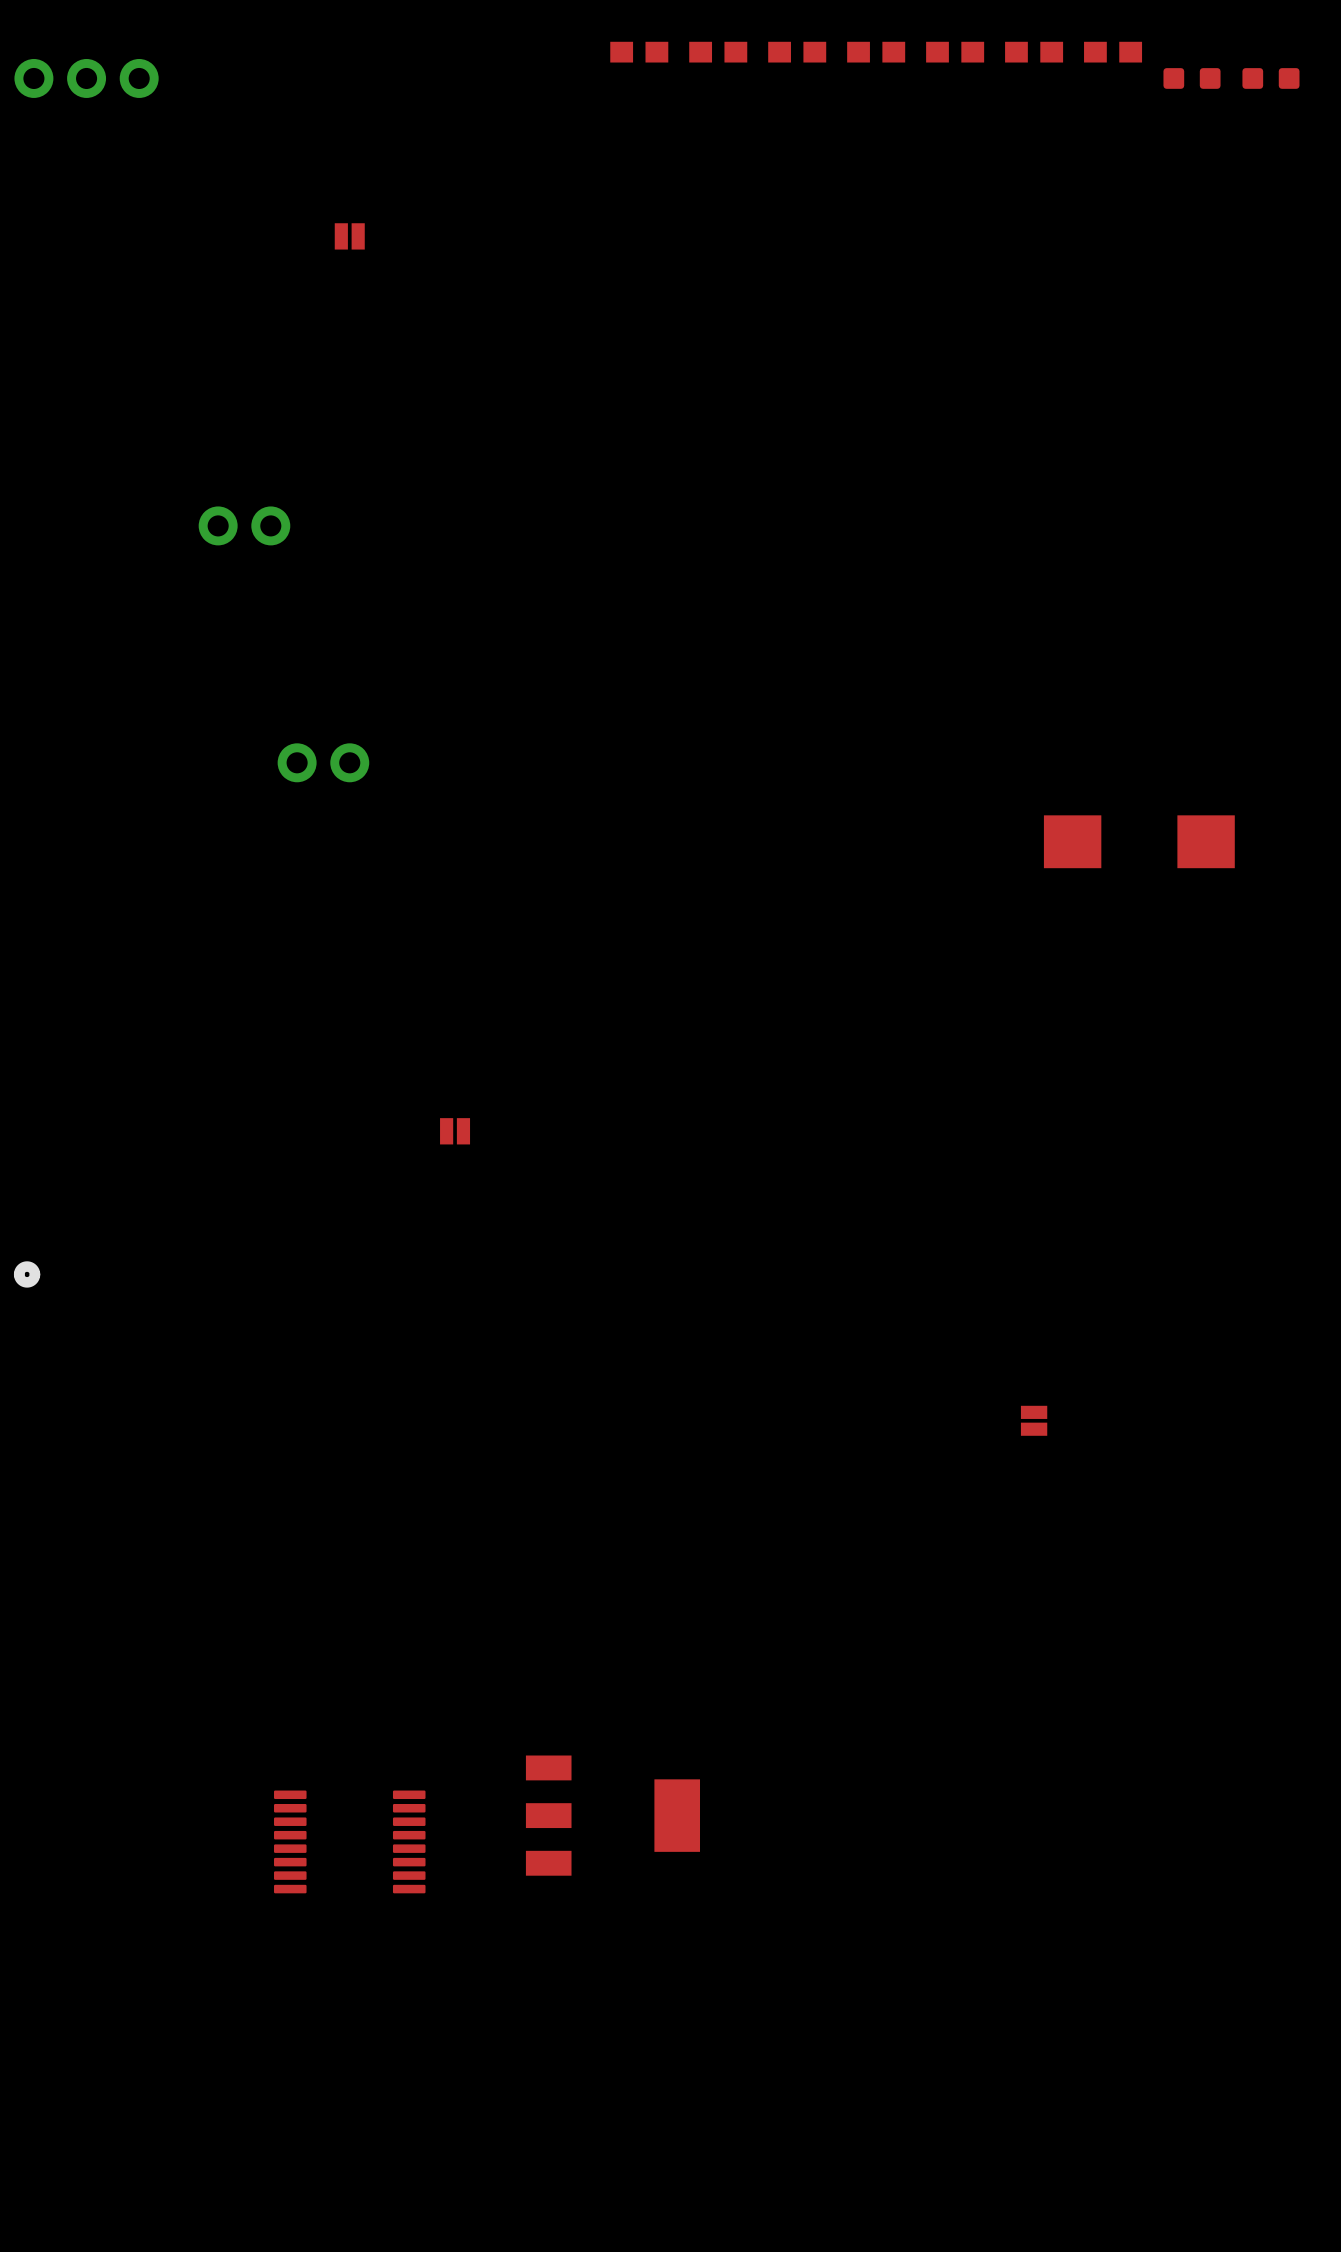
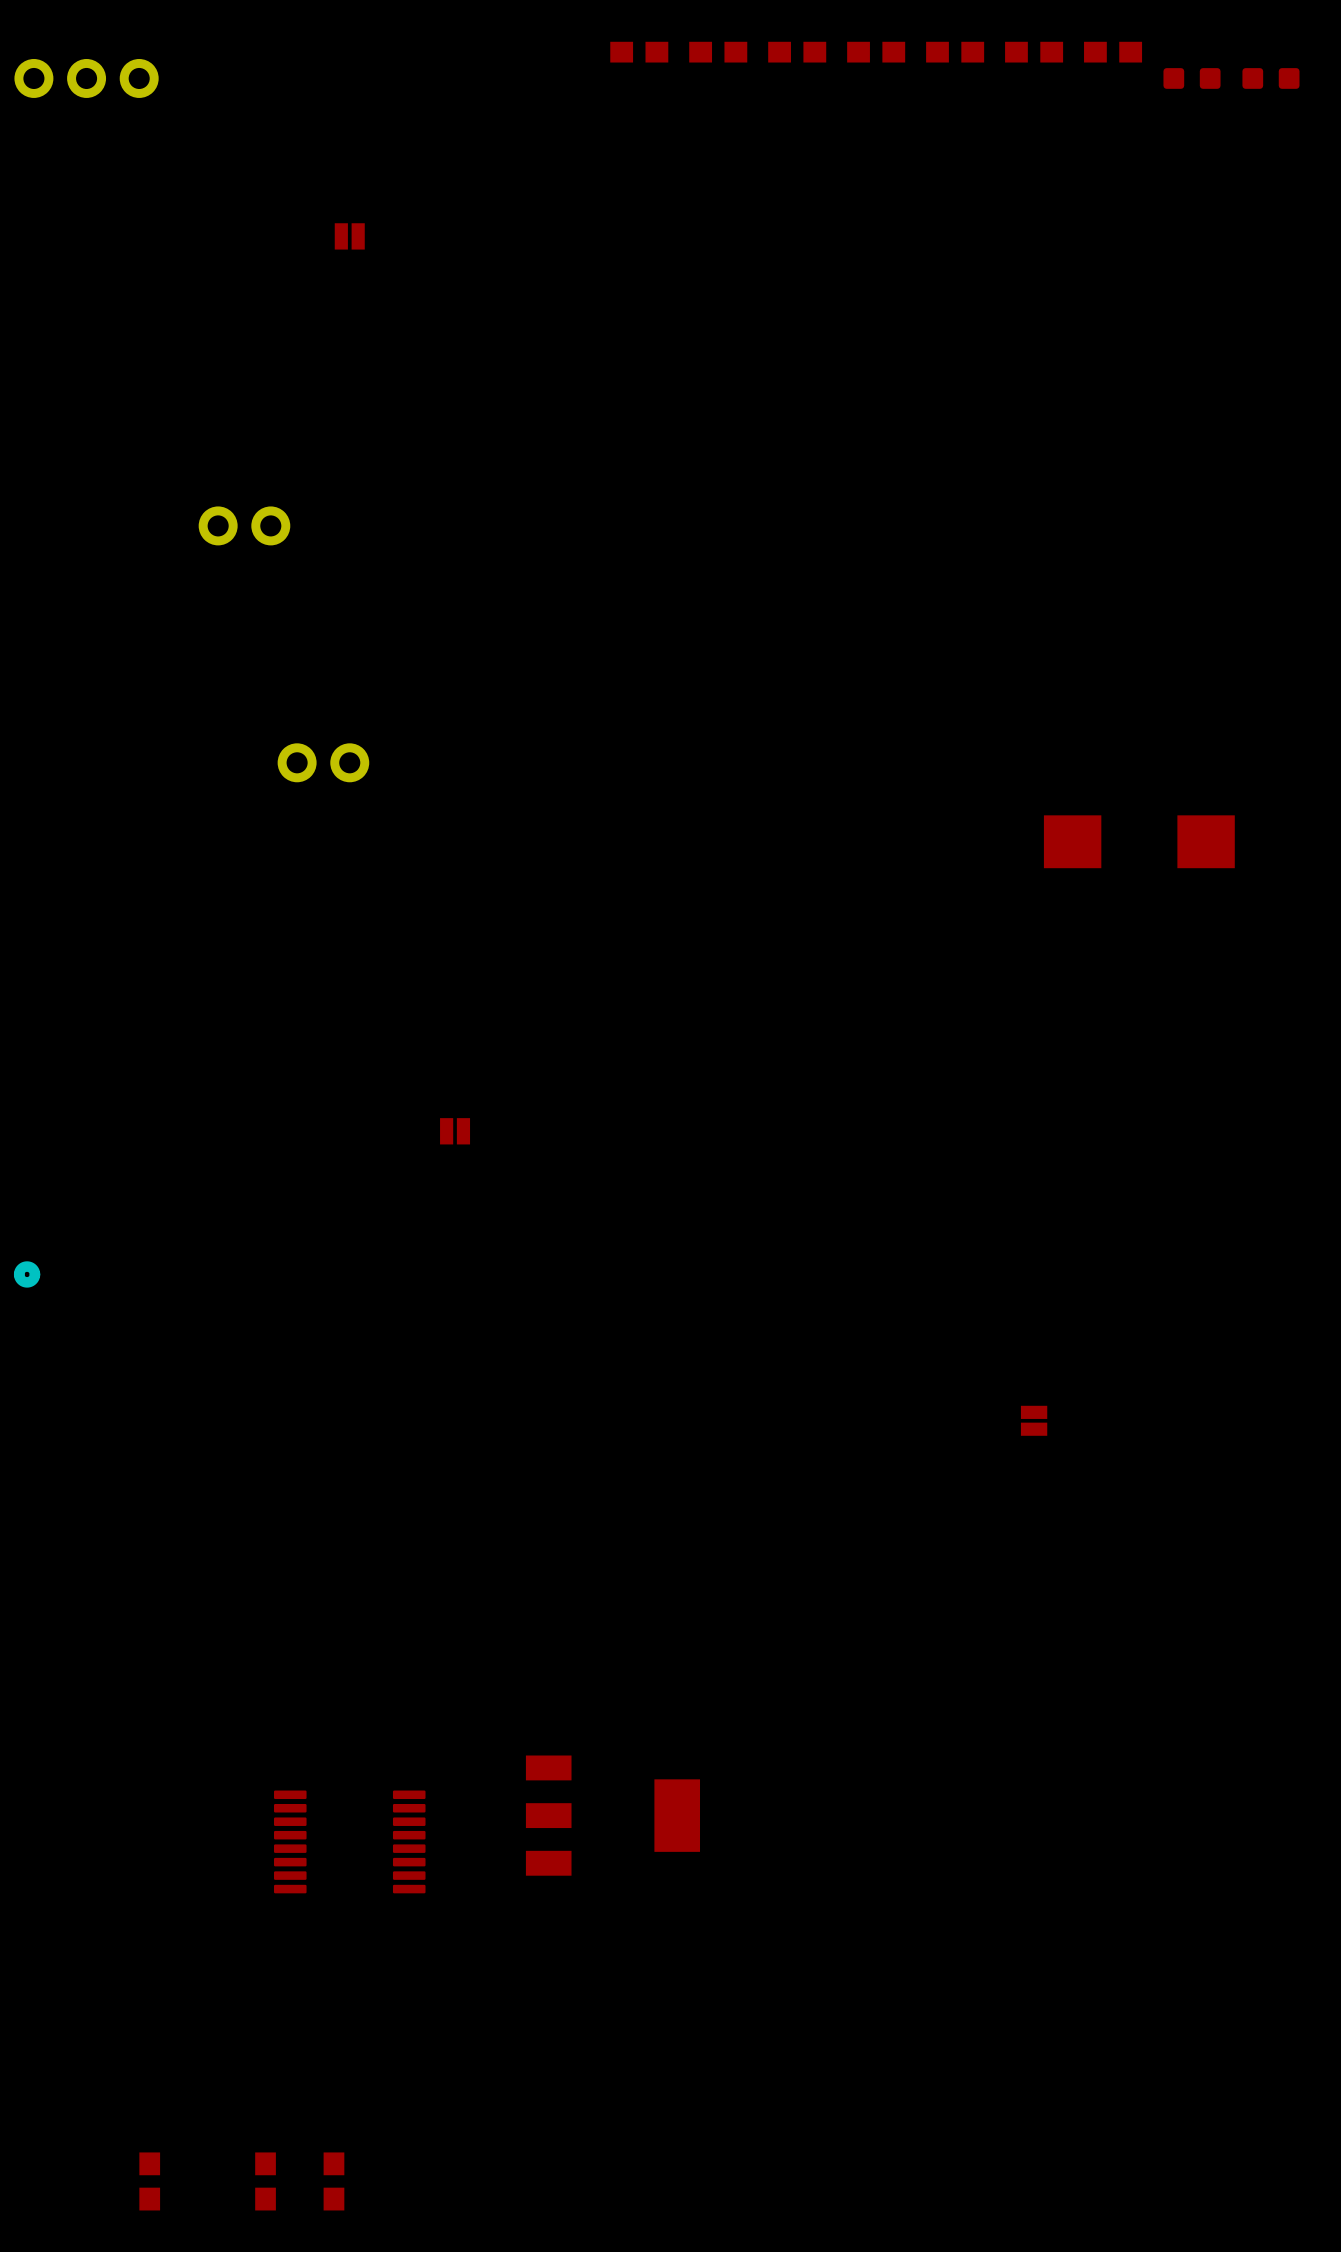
part: none -> (149, 2181)
part: none -> (265, 2181)
part: none -> (333, 2181)

